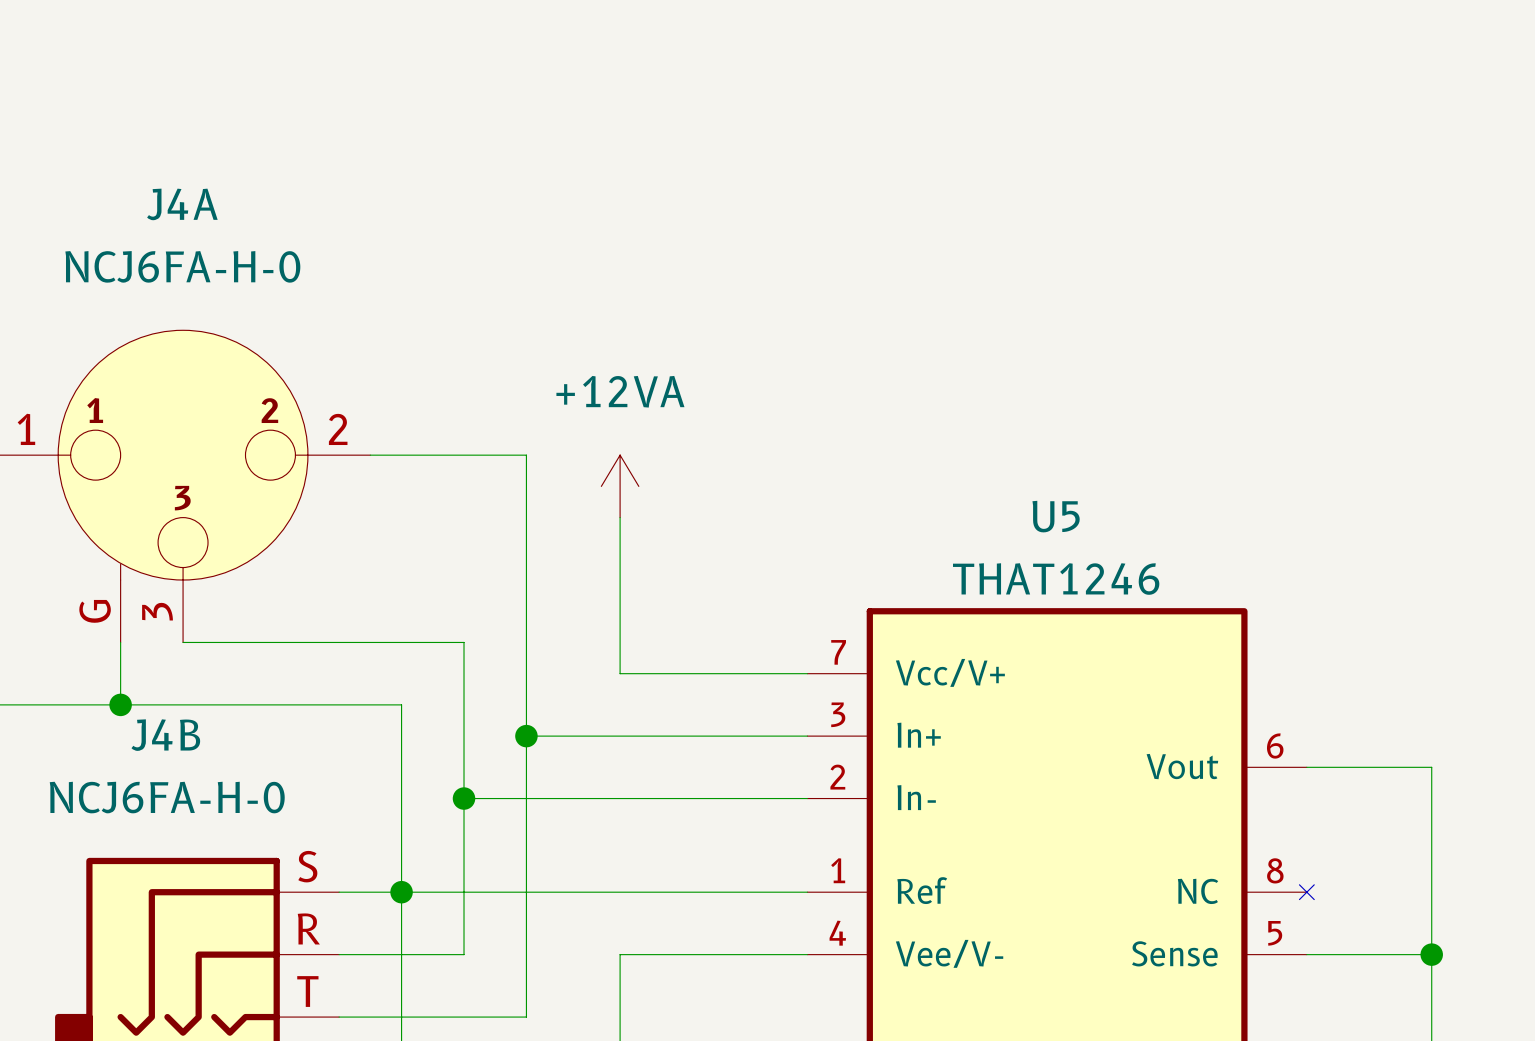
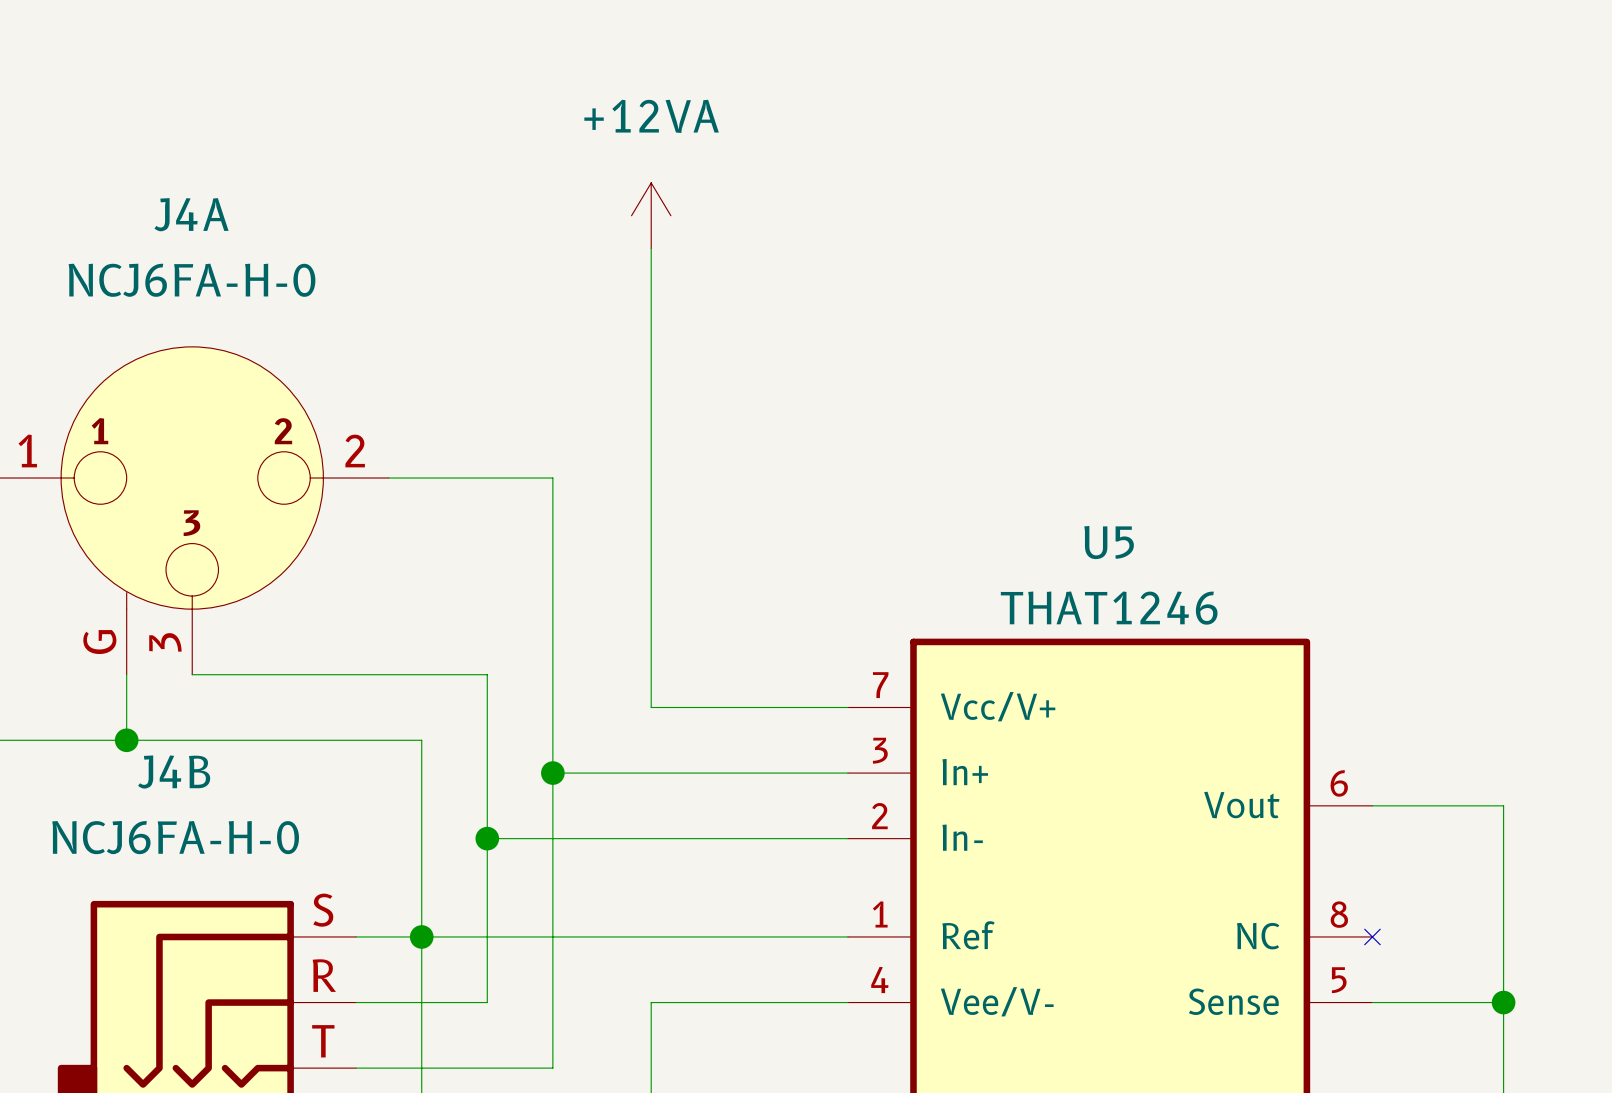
wire: none -> (651, 248) (651, 543)
power symbol position: +12VA (620, 486) -> +12VA (651, 215)

